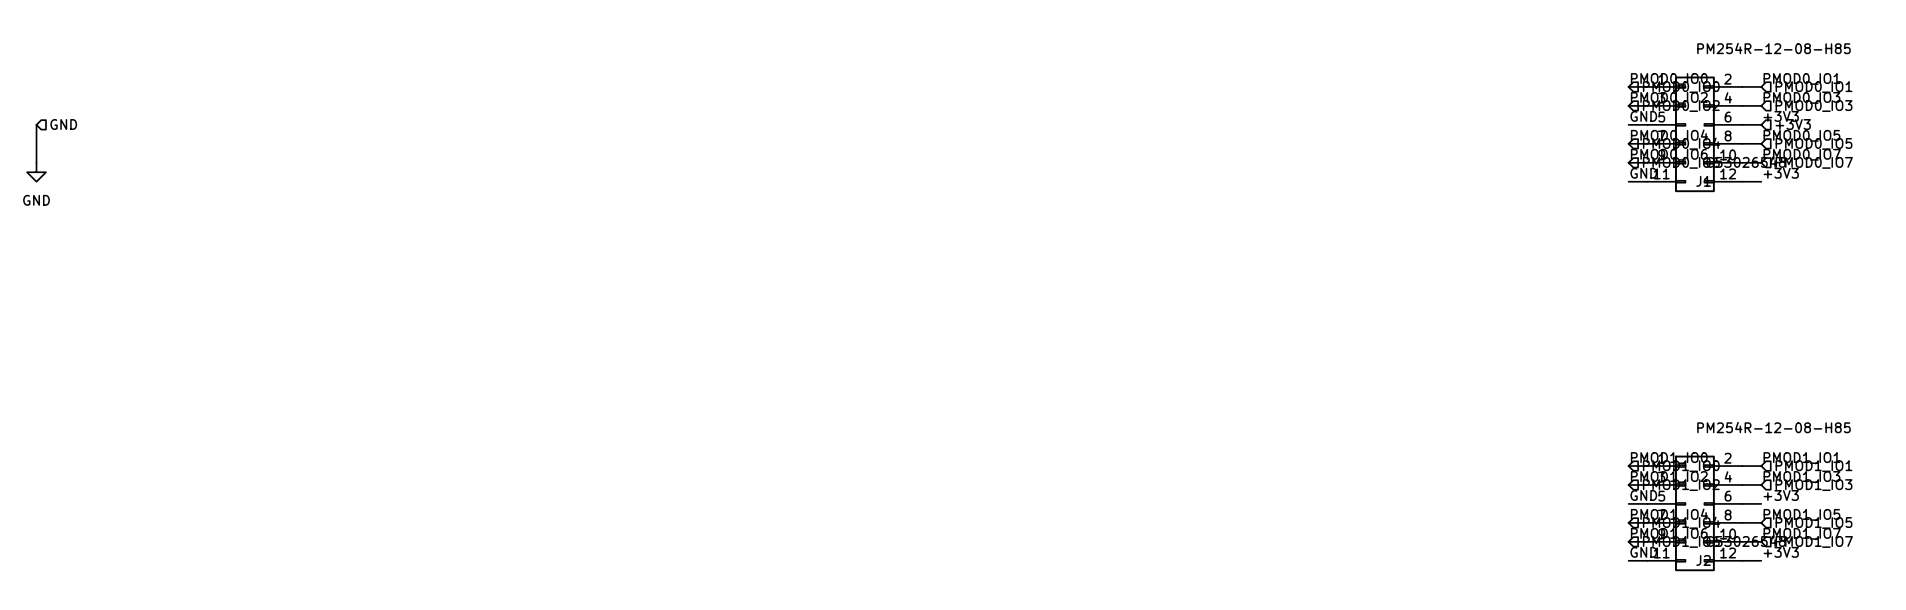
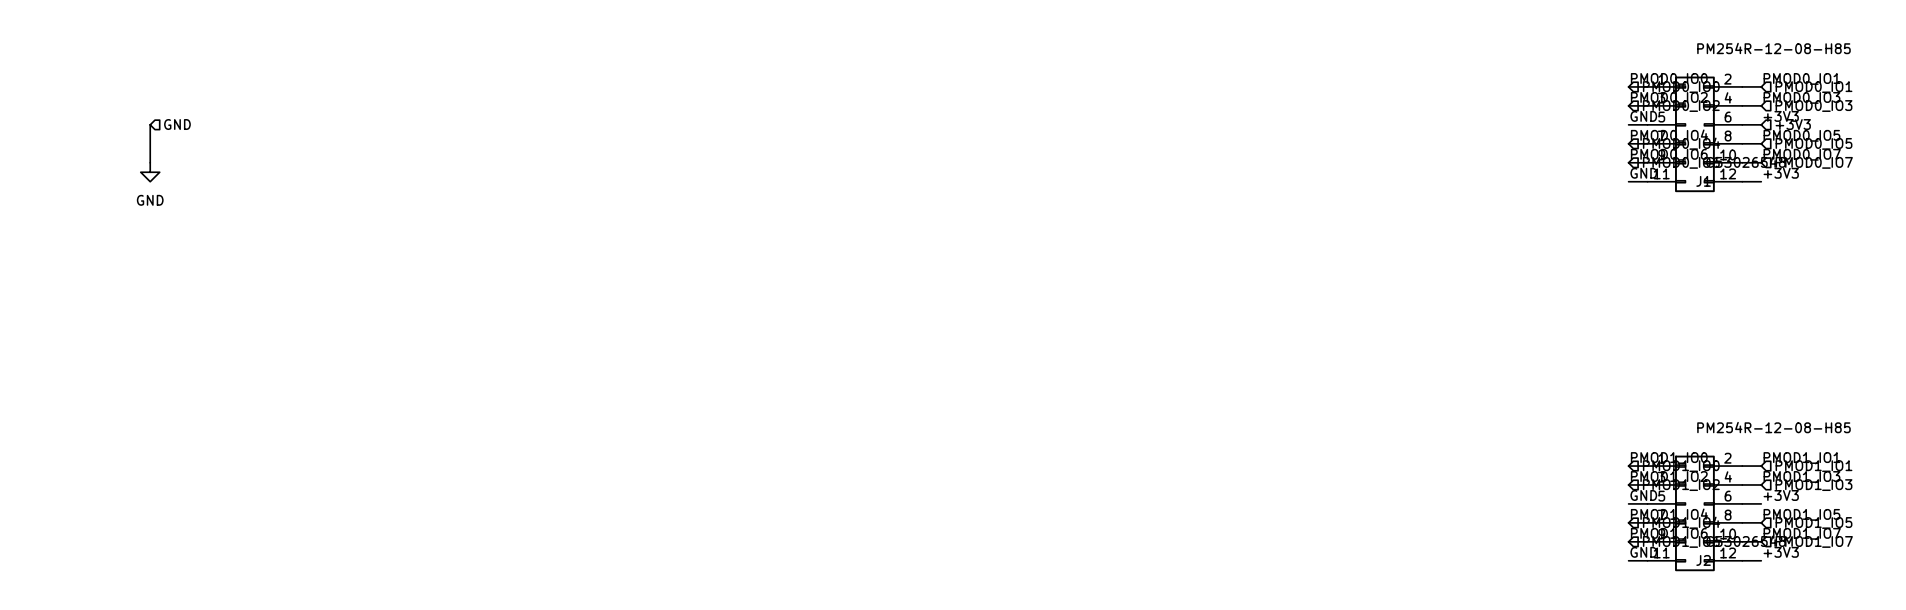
wire: (36, 124) (36, 162) -> (150, 124) (150, 162)
hierarchical label position: GND (63, 124) -> GND (177, 124)
power symbol position: GND (36, 172) -> GND (150, 172)

